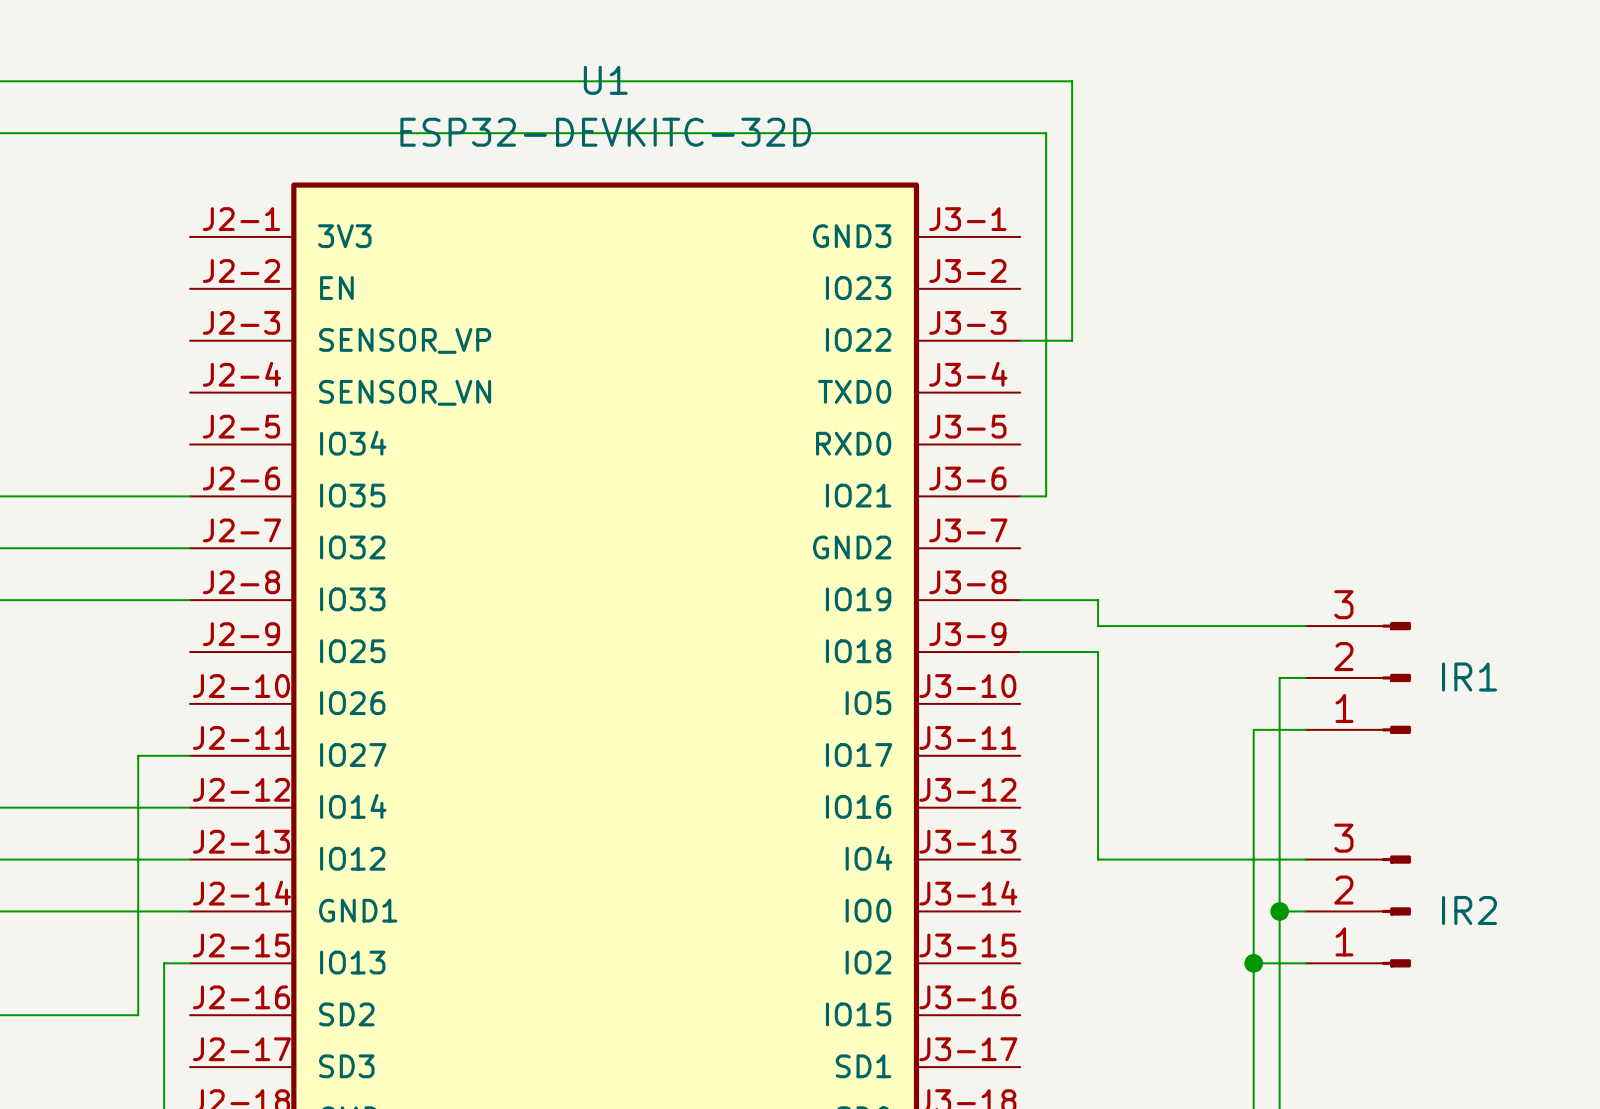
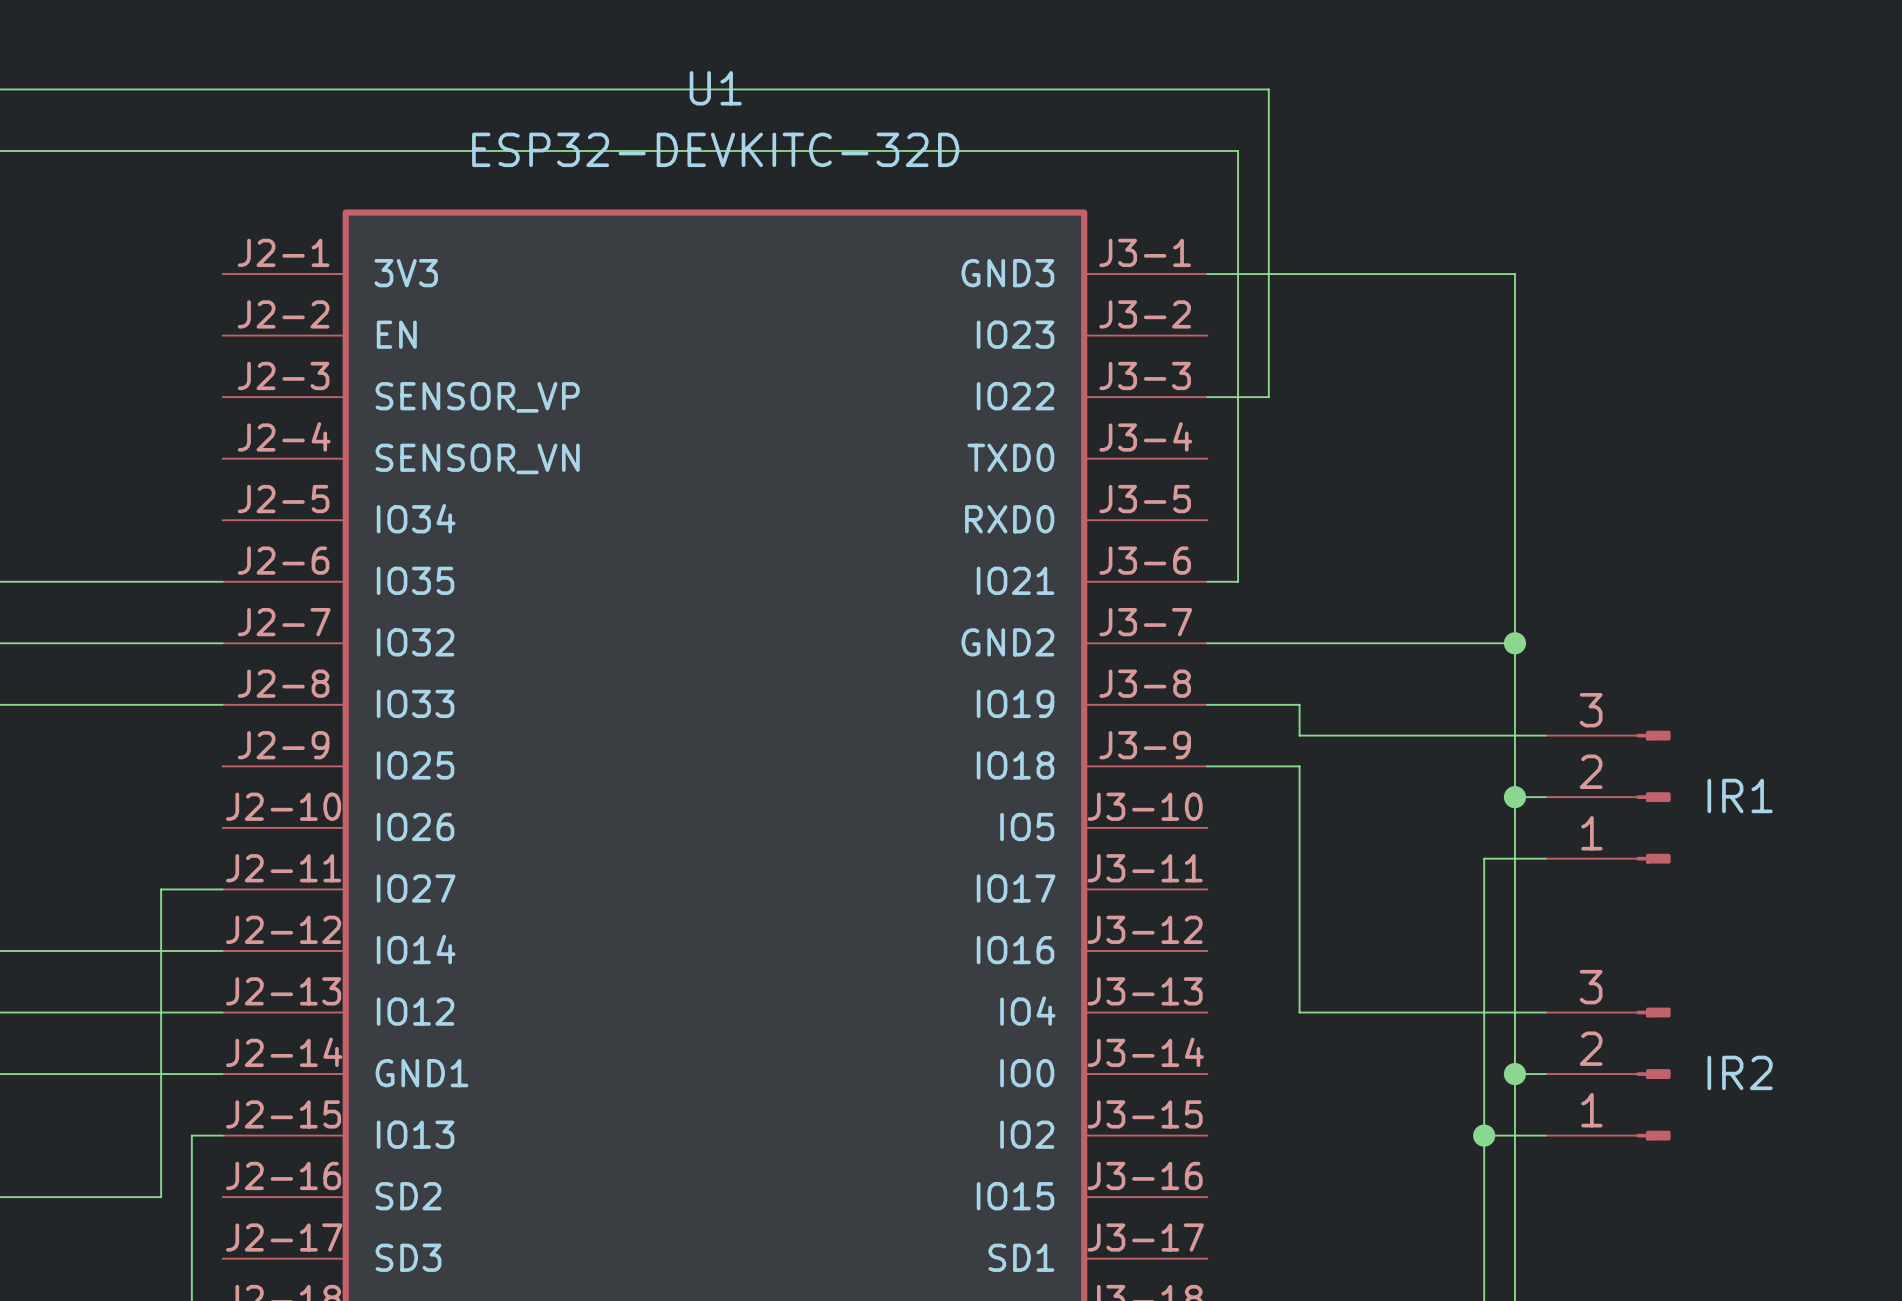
wire: none -> (1207, 274) (1514, 274) (1514, 797)
wire: none -> (1207, 643) (1514, 643)
junction: none -> (1514, 643)
junction: none -> (1514, 797)

